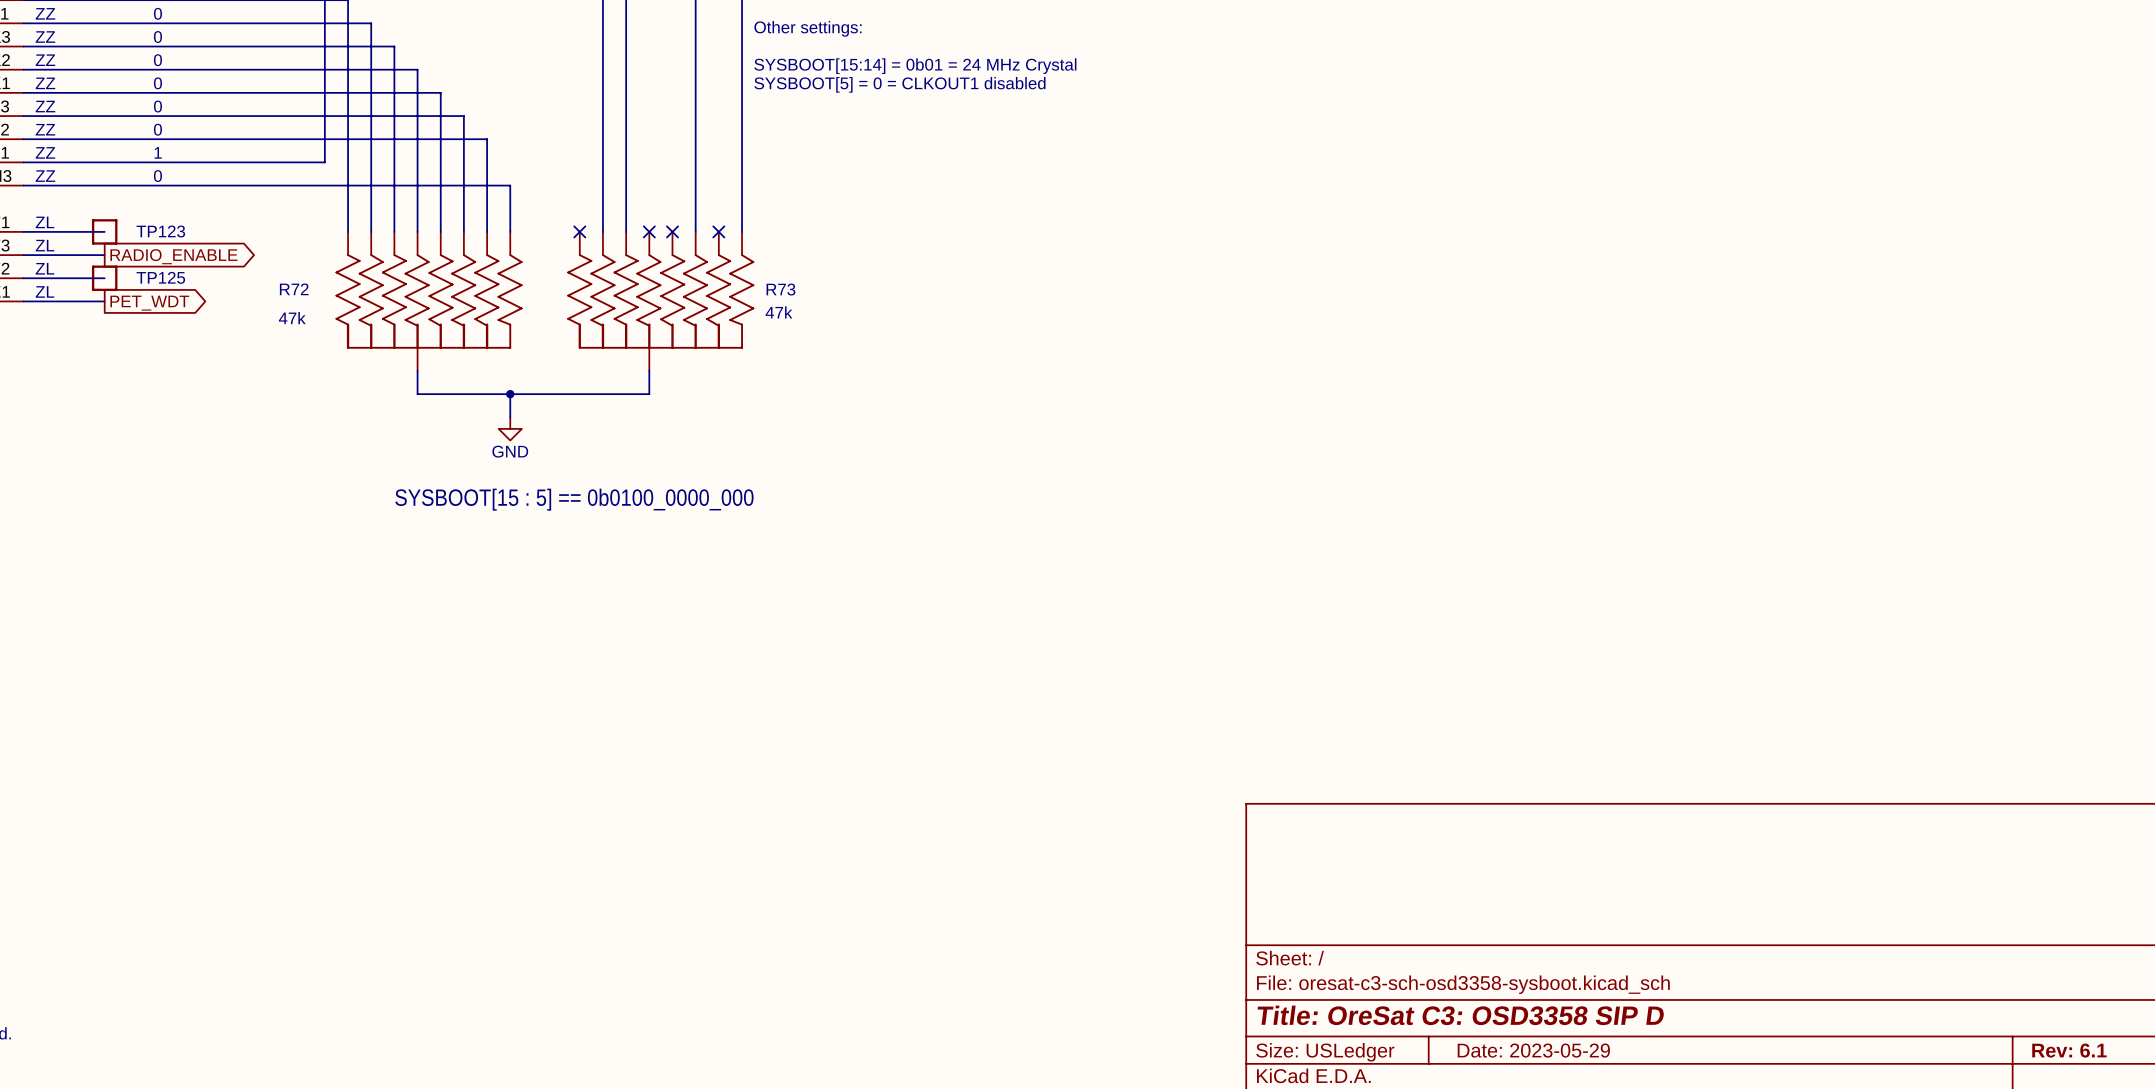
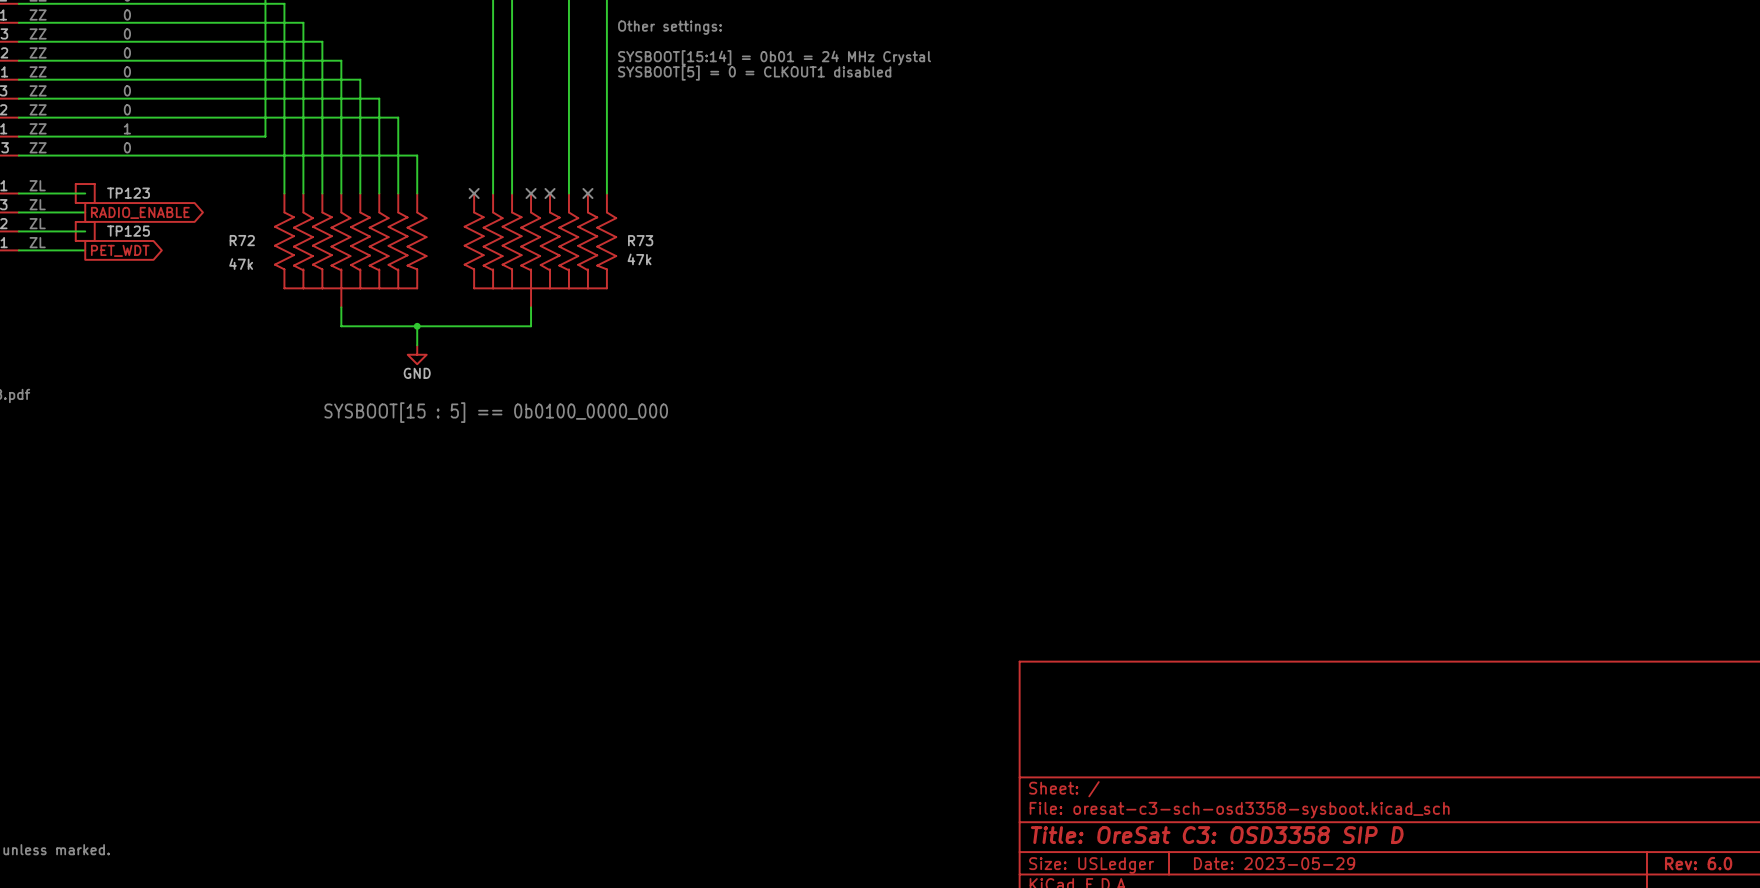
title block: Rev: 6.1 (2069, 1050) -> Rev: 6.0 (1698, 863)

